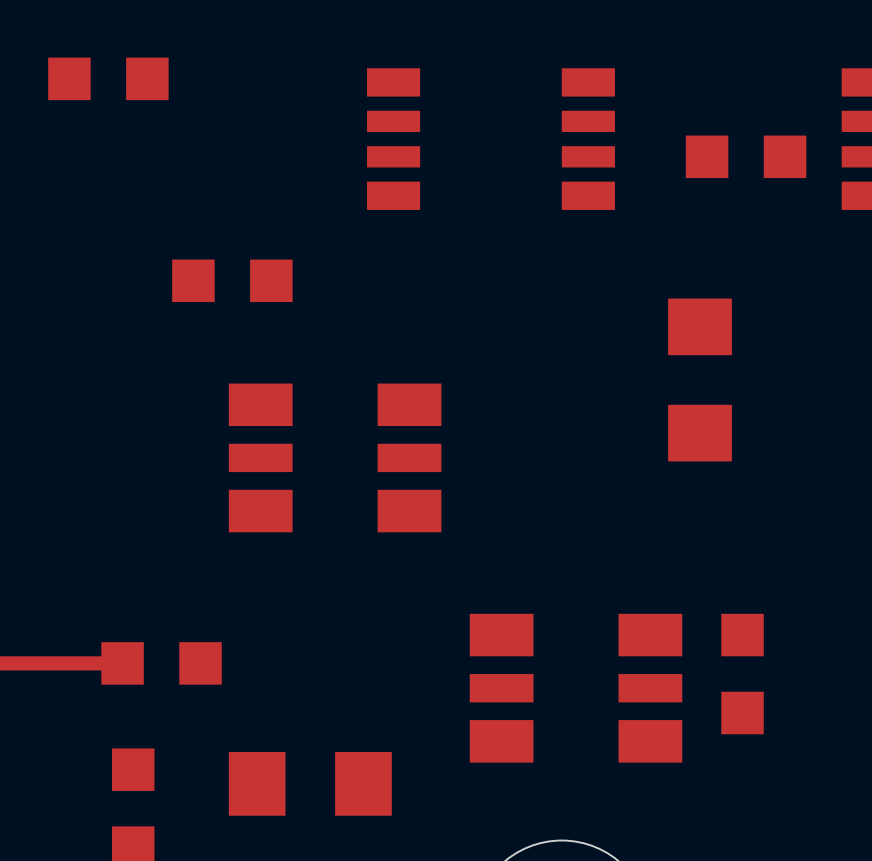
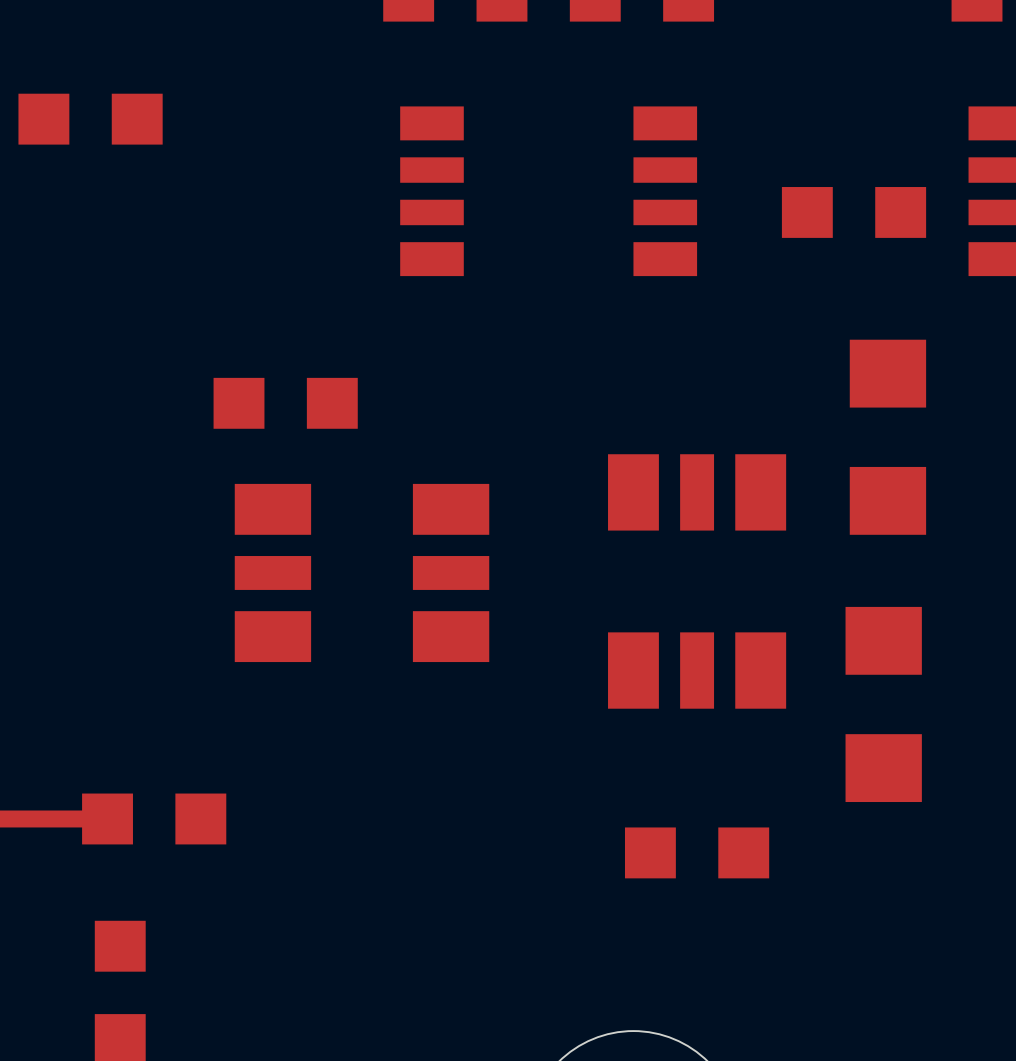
part position: (232, 280) -> (285, 403)
part position: (700, 379) -> (887, 437)
part: none -> (697, 581)
part: none -> (883, 704)
part footprint: [469, 613, 683, 763] -> [624, 827, 770, 879]
part: (742, 674) -> none
part: (310, 783) -> none

